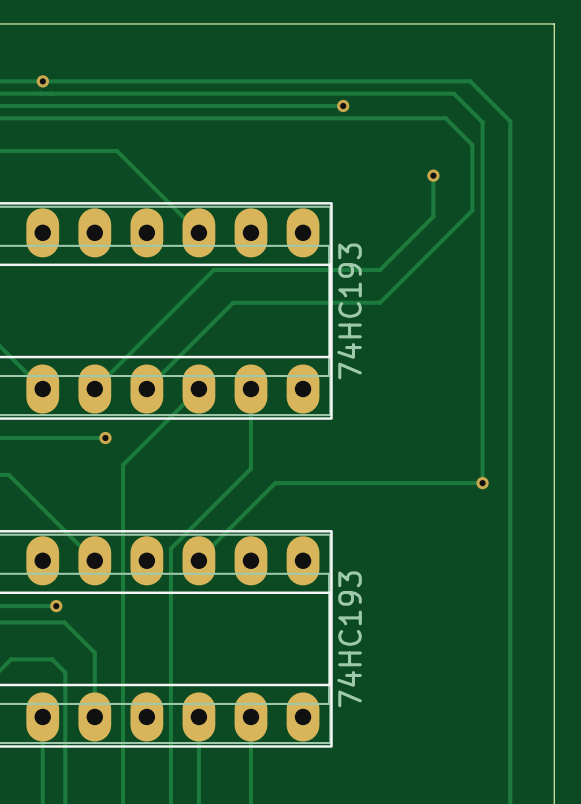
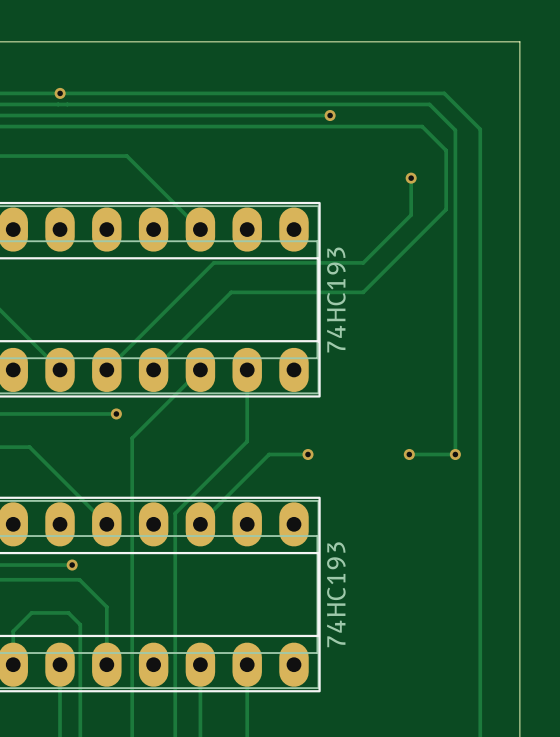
track: (318, 483) (431, 483) -> none
via: none -> (308, 454)
via: none -> (409, 454)

